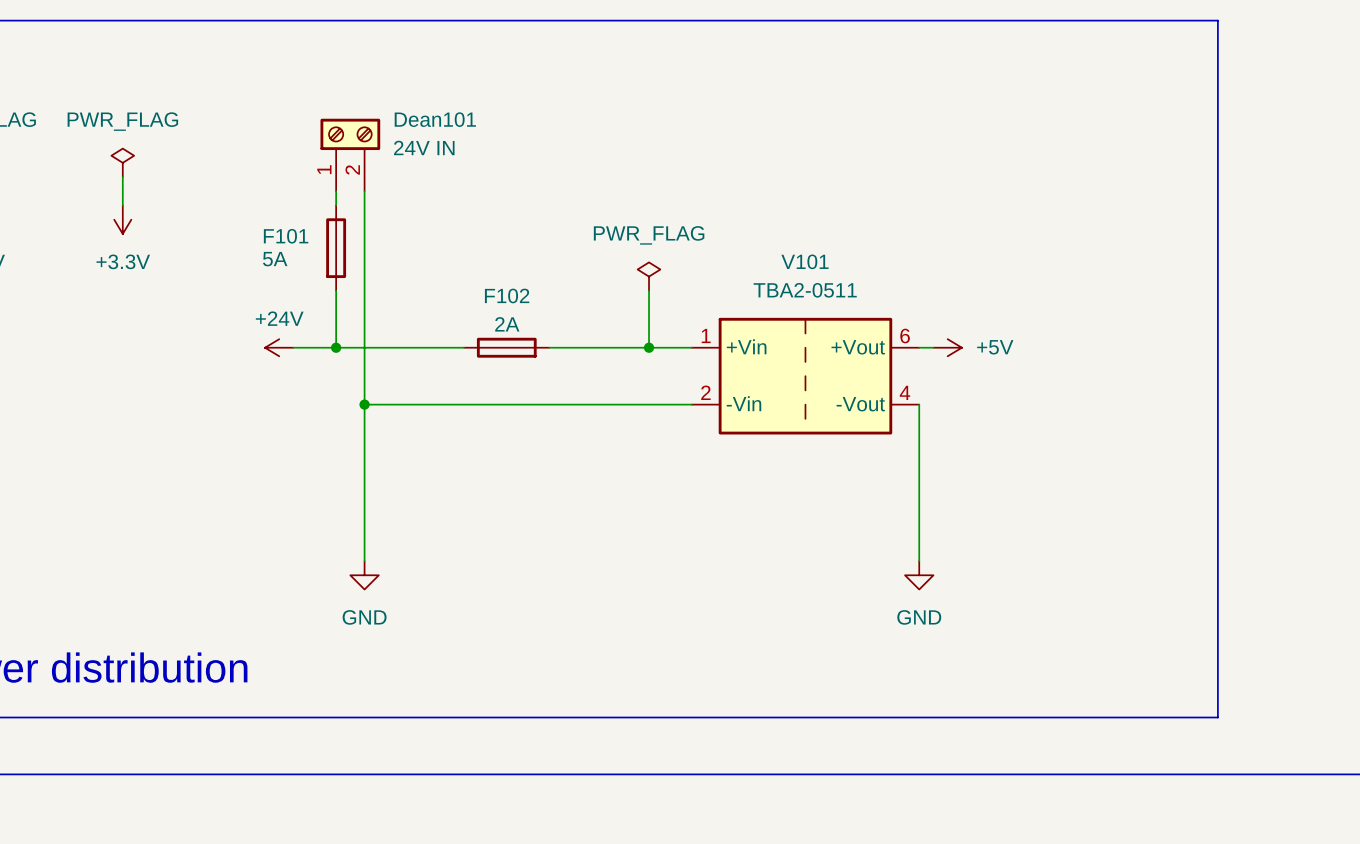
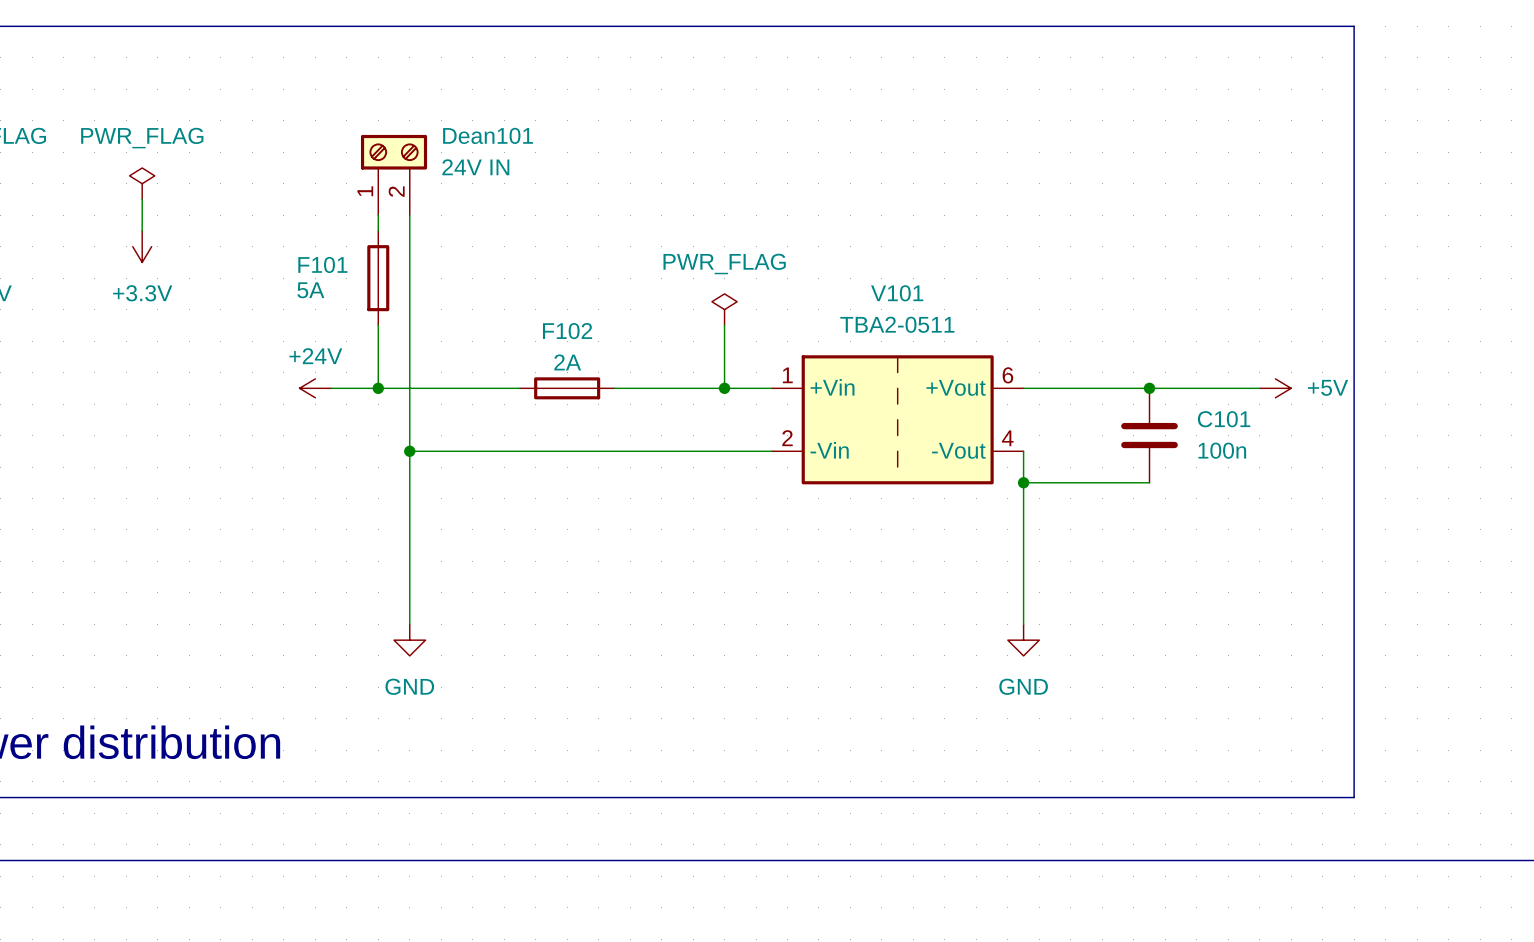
wire: none -> (1039, 388) (1259, 388)
power symbol position: +5V (947, 347) -> +5V (1275, 388)
junction: none -> (1149, 388)
C101: none -> 100n (1149, 435)
wire: none -> (1023, 482) (1149, 482)
junction: none -> (1023, 482)

